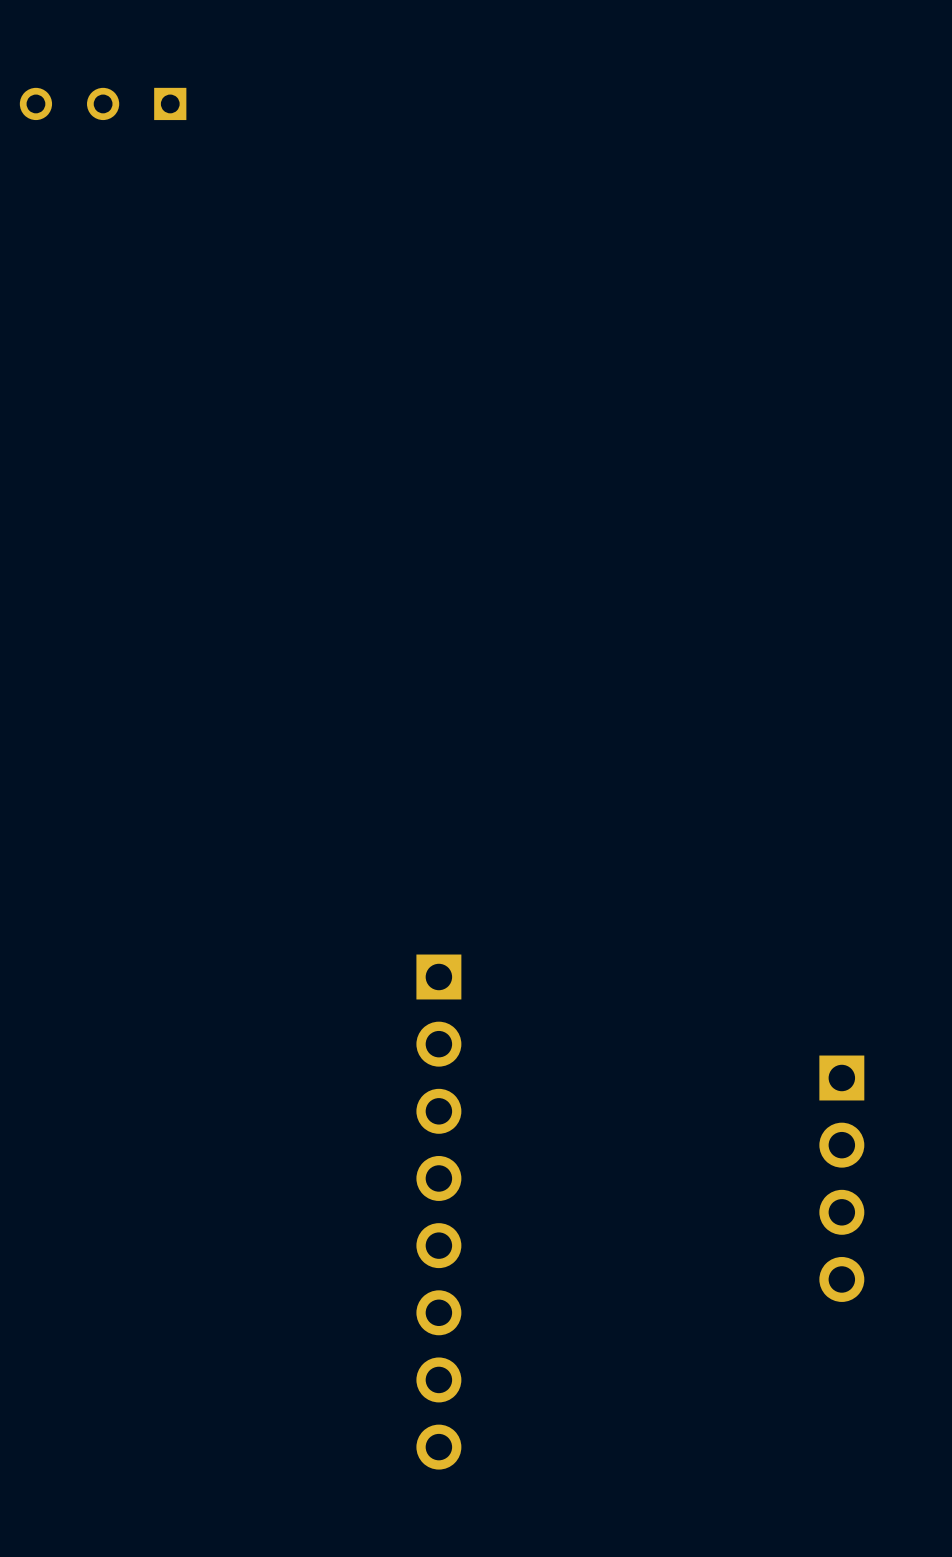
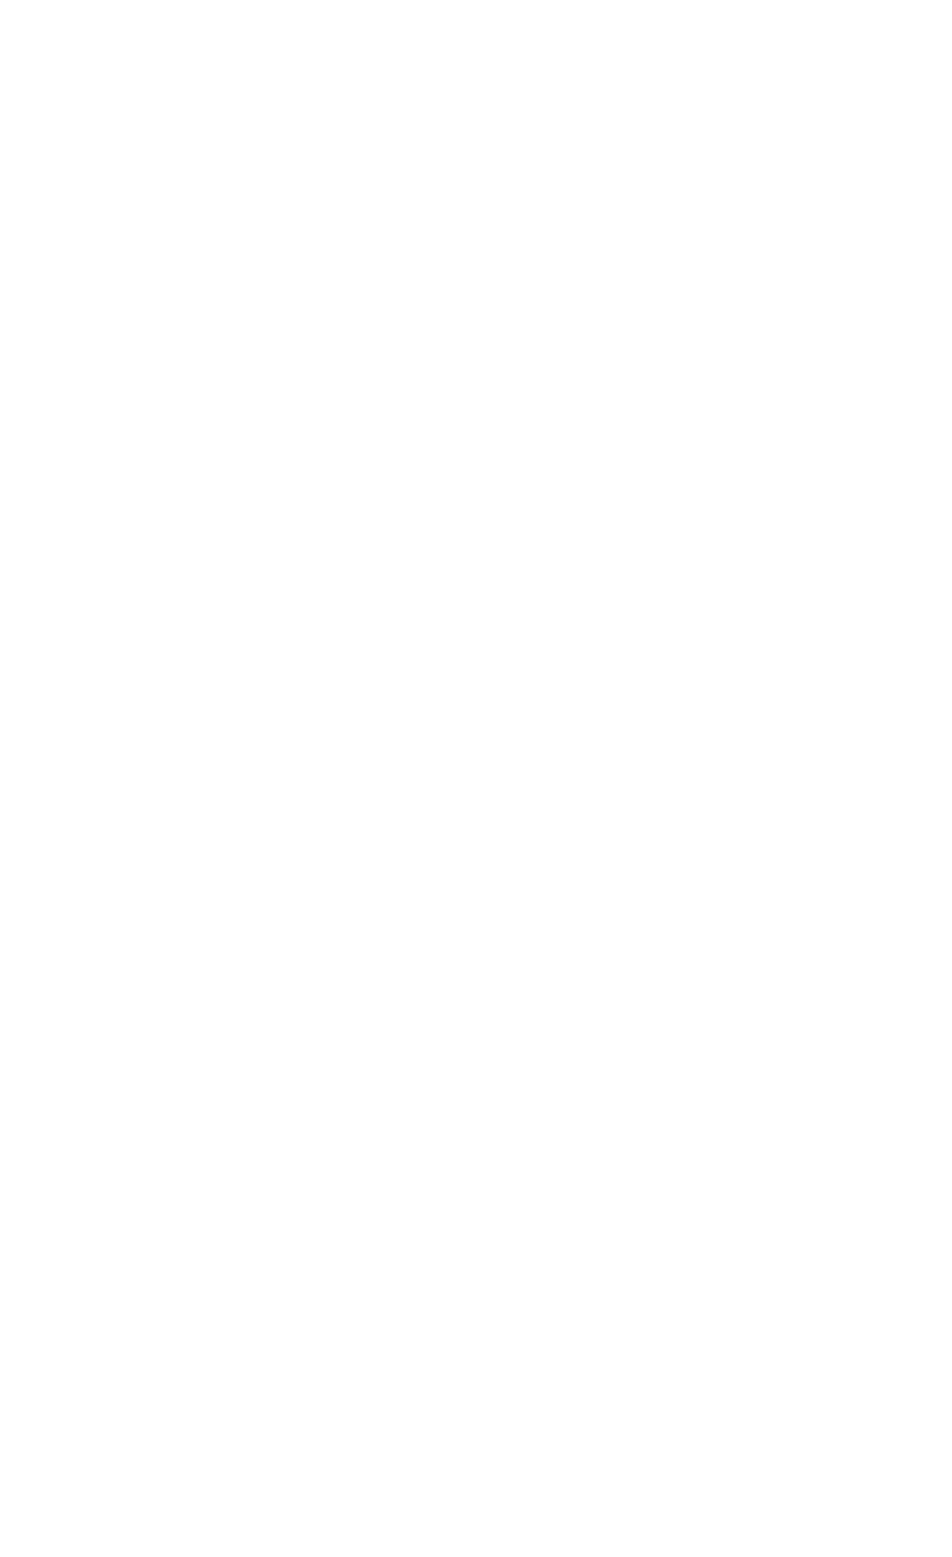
part: (103, 103) -> none
part: (841, 1178) -> none
part: (438, 1212) -> none

